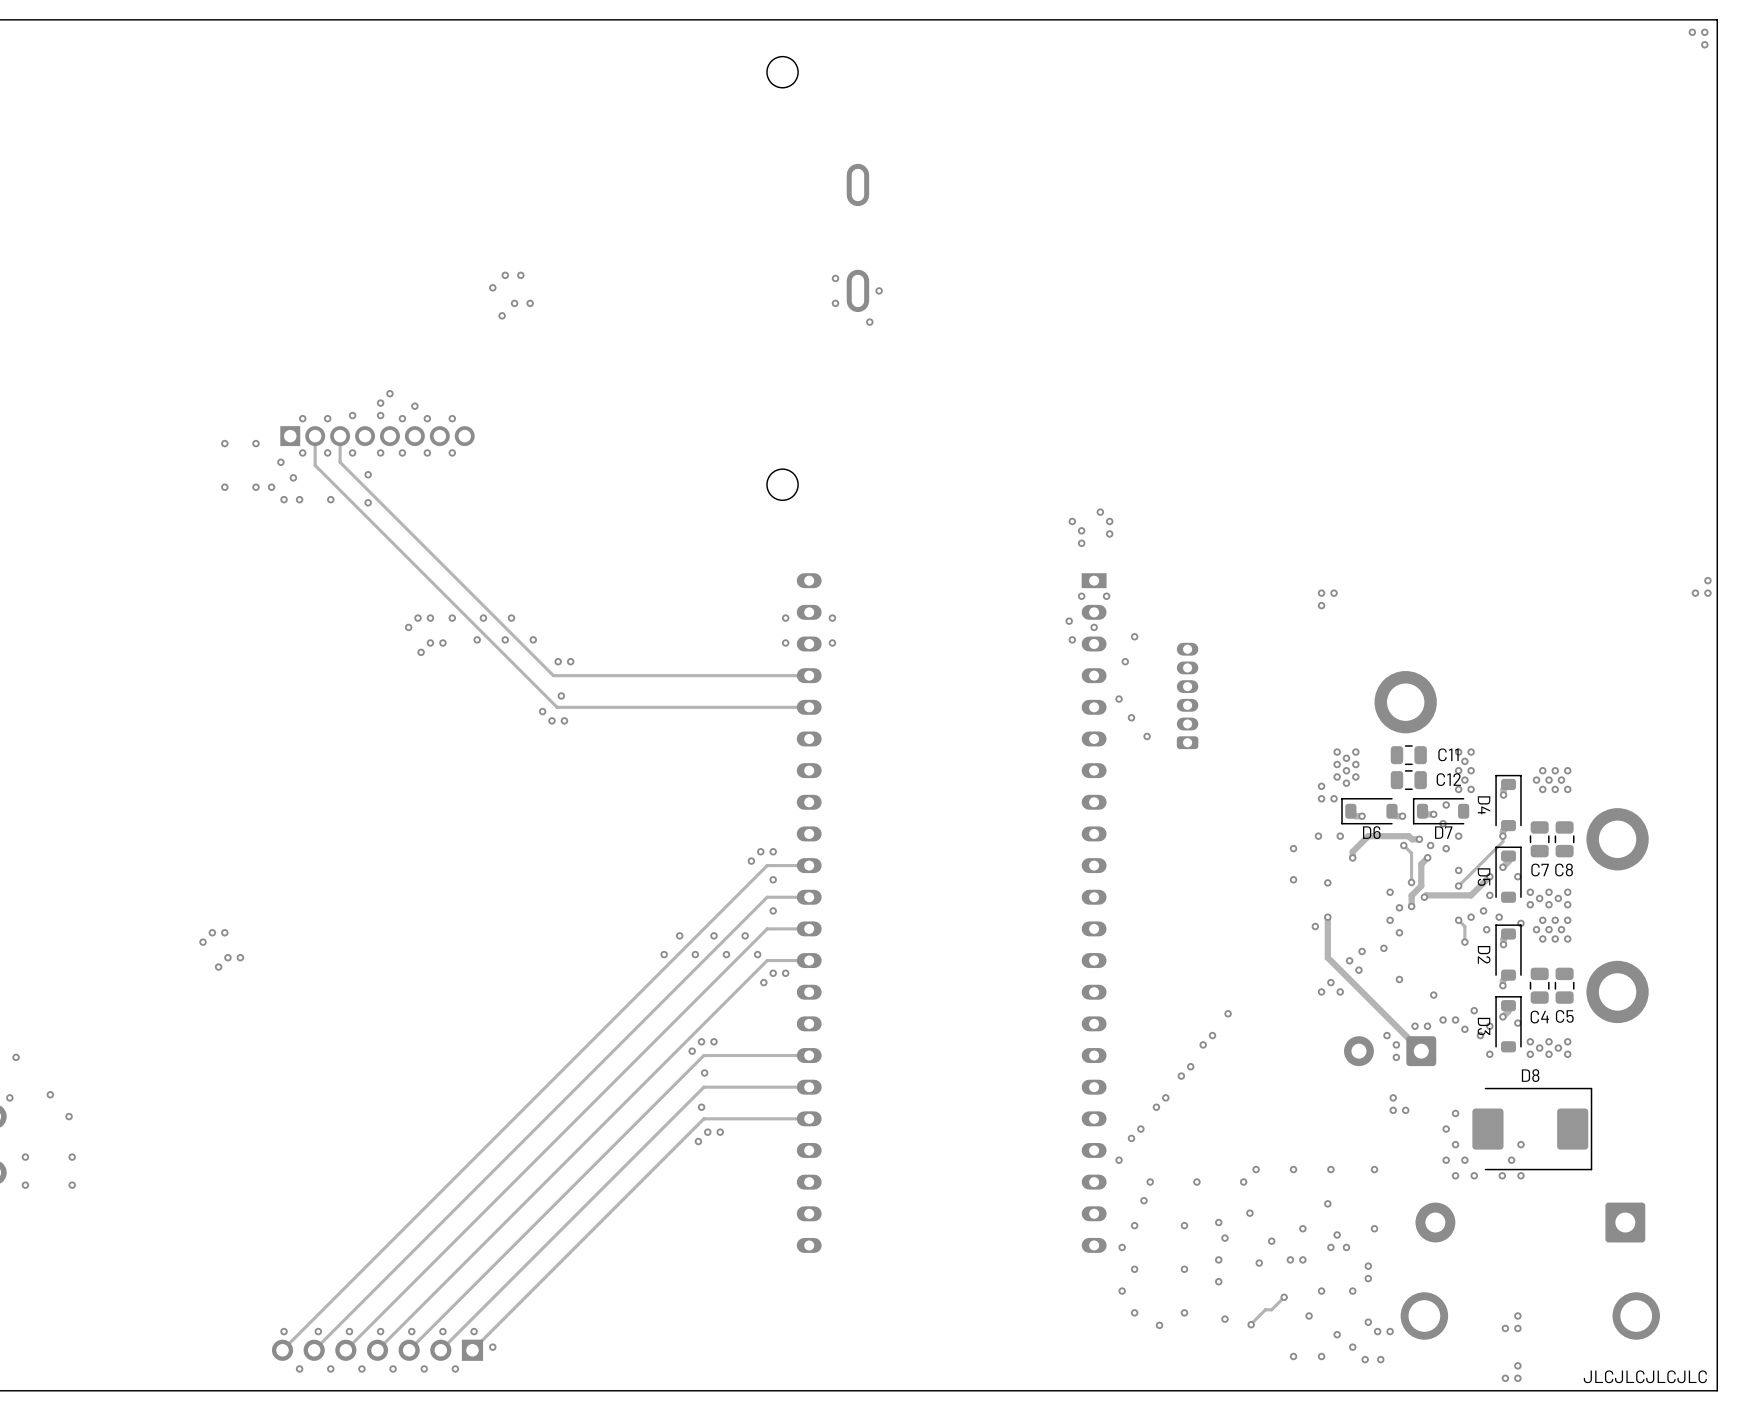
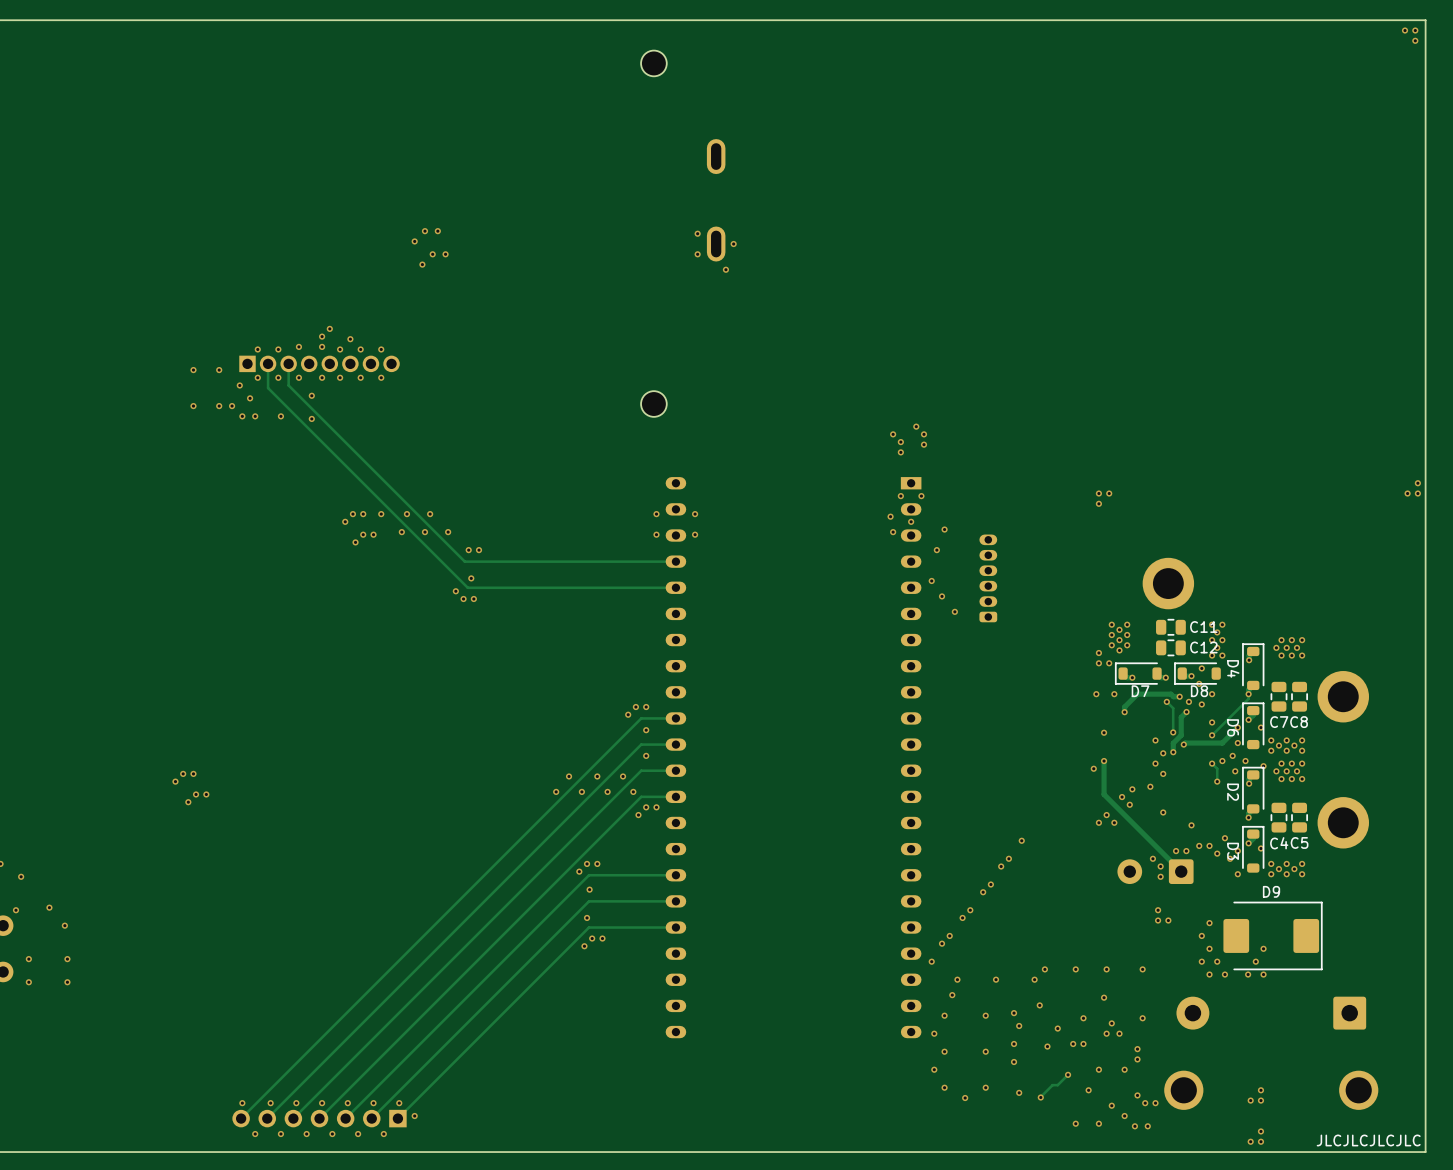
D6 name: D6 (1371, 832) -> D7 (1140, 691)
D7 name: D7 (1443, 832) -> D8 (1199, 691)
via: (1293, 848) -> none
D5 name: D5 (1483, 877) -> D6 (1233, 727)
via: (1293, 879) -> none
D8 name: D8 (1530, 1075) -> D9 (1271, 891)

